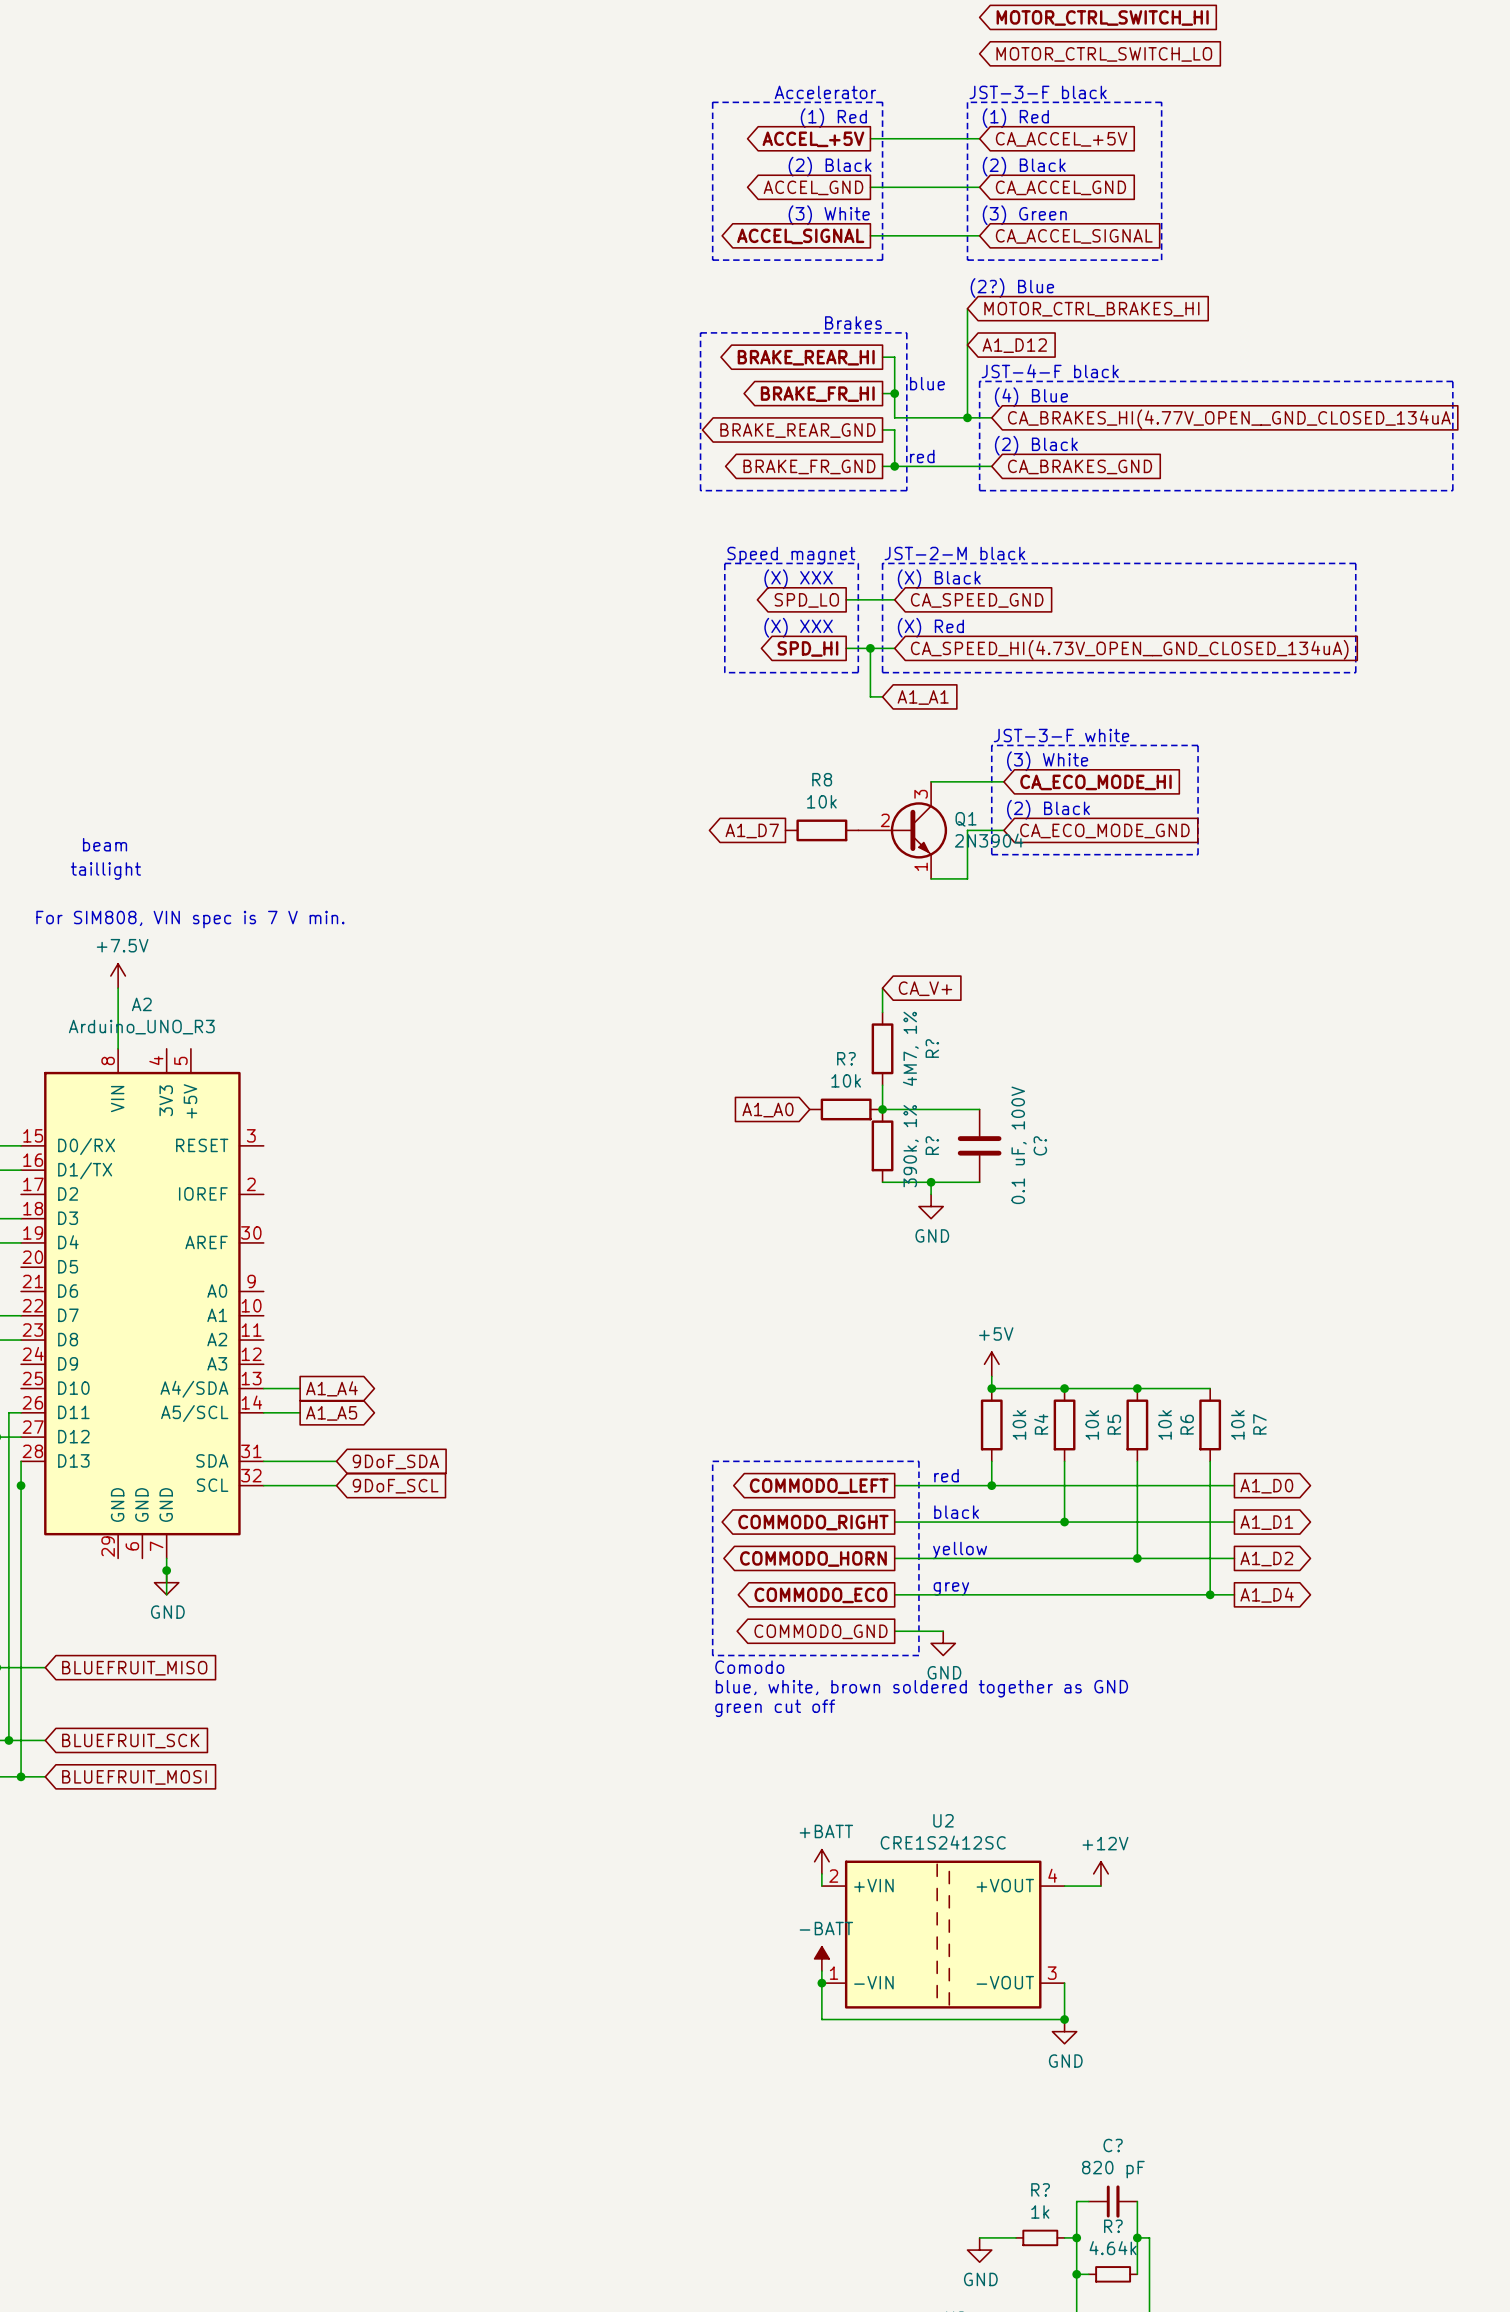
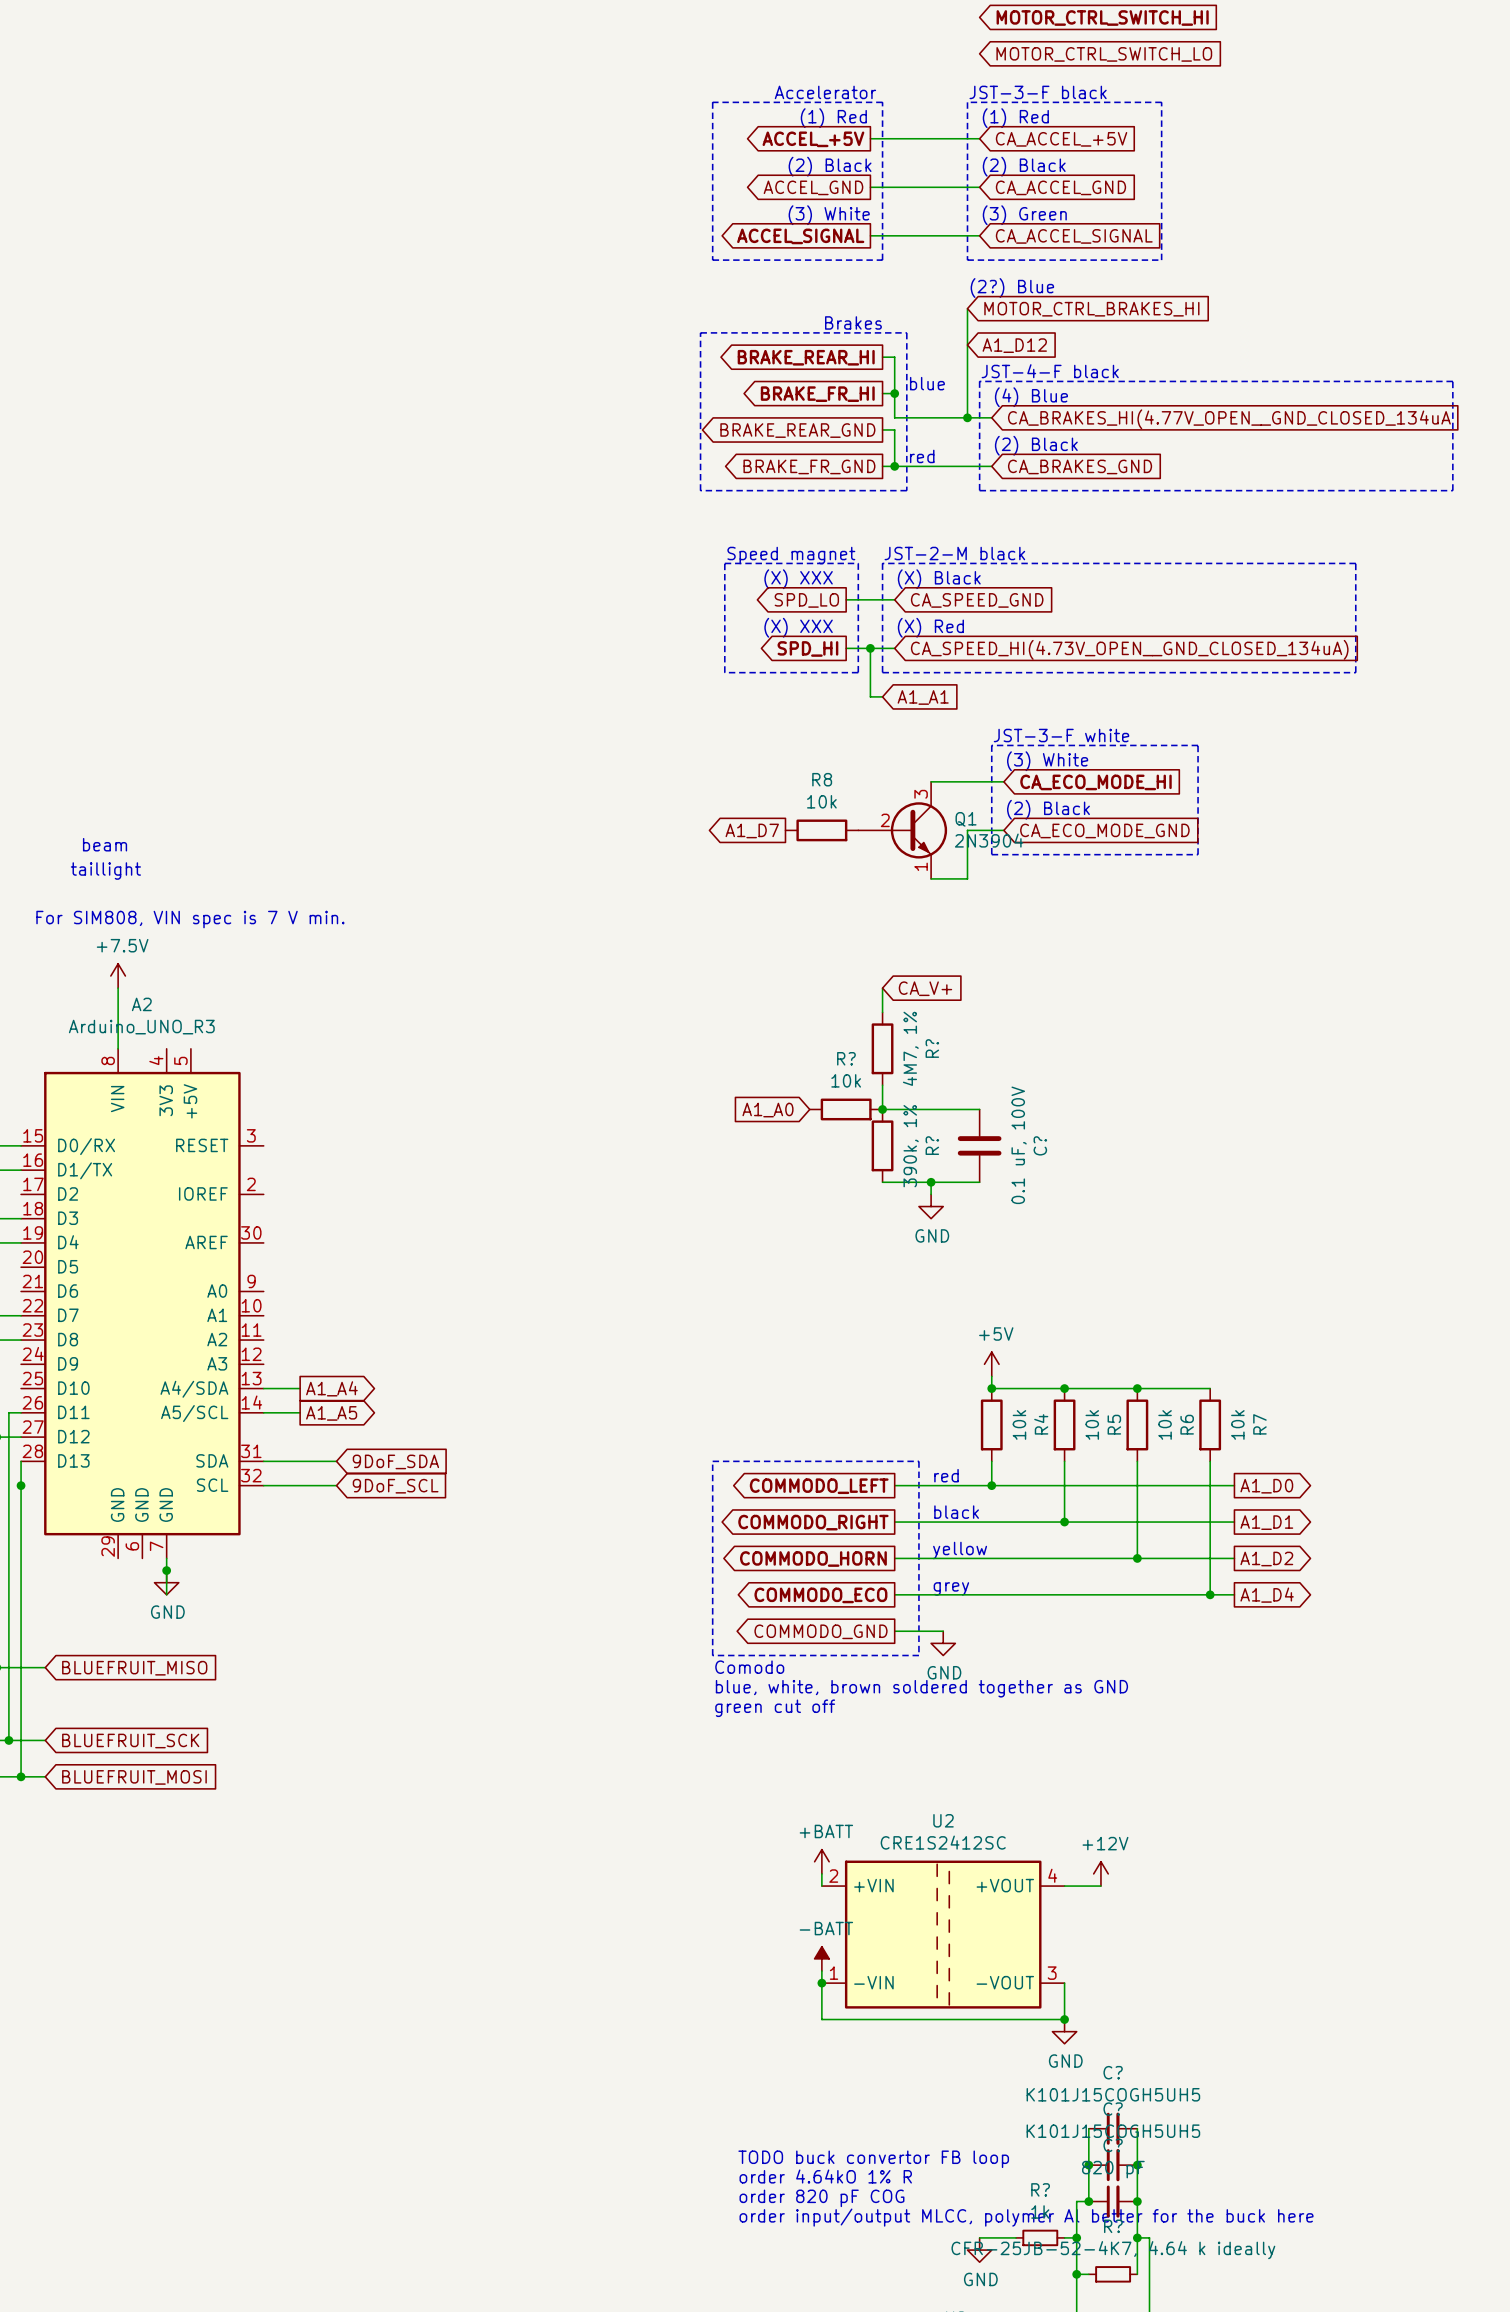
wire: none -> (1088, 2128) (1088, 2201)
C?: none -> K101J15COGH5UH5 (1113, 2128)
wire: none -> (1137, 2128) (1137, 2201)
text: none -> TODO buck convertor FB loop (873, 2159)
junction: none -> (1088, 2165)
C?: none -> K101J15COGH5UH5 (1113, 2165)
junction: none -> (1137, 2165)
text: none -> order 4.64kO 1% R (825, 2176)
text: none -> order 820 pF COG (821, 2198)
junction: none -> (1088, 2201)
junction: none -> (1137, 2201)
text: none -> order input/output MLCC, polymer Al better for the buck here (1026, 2217)
R? value: 4.64k (1113, 2248) -> CFR-25JB-52-4K7, 4.64 k ideally (1113, 2250)

